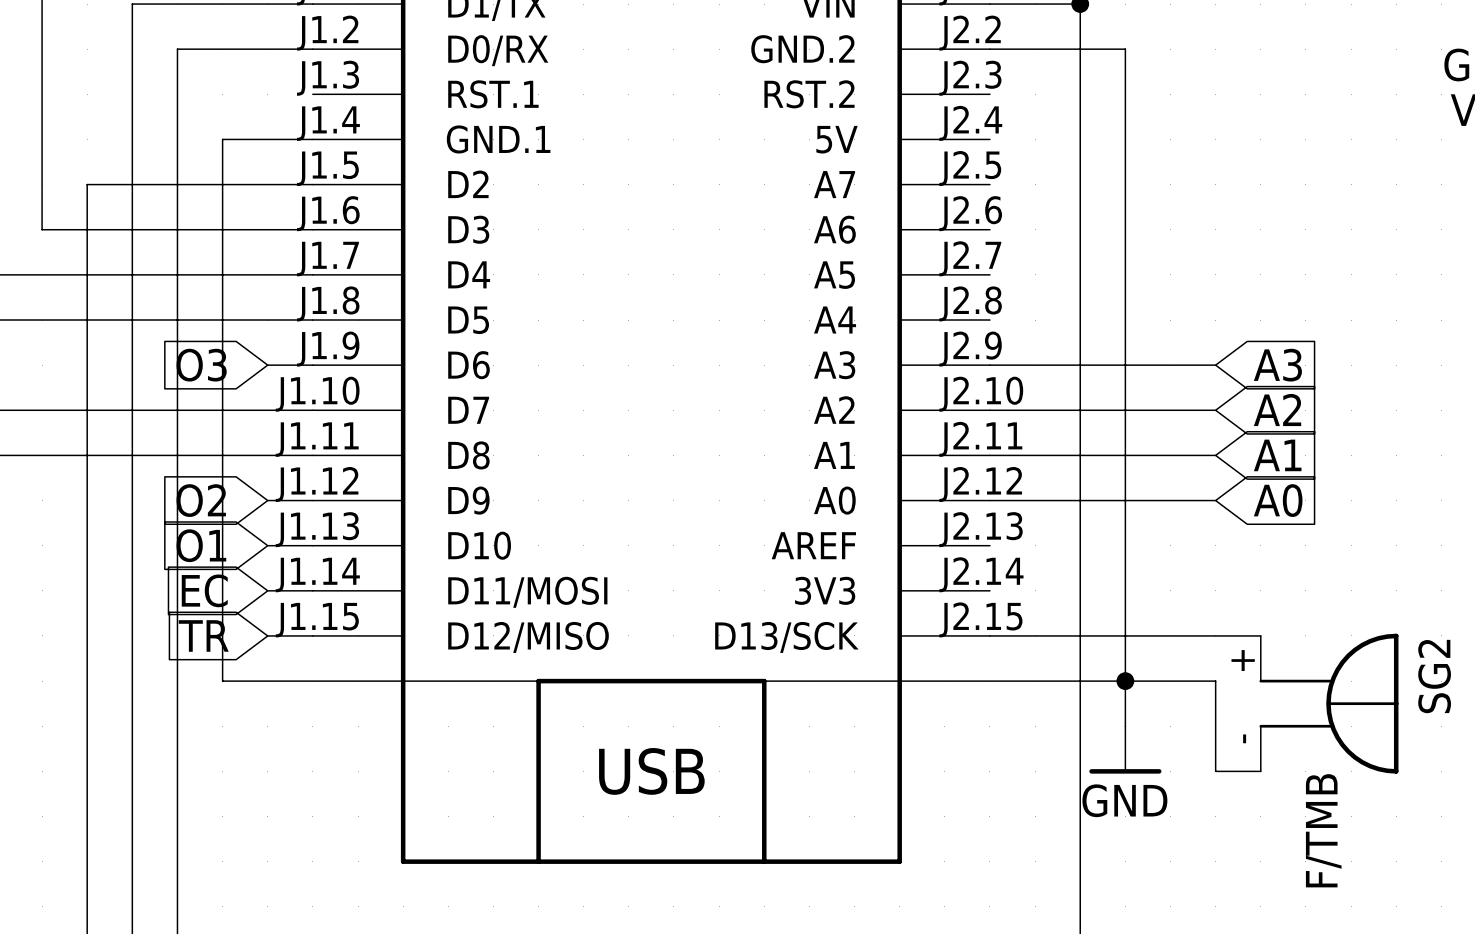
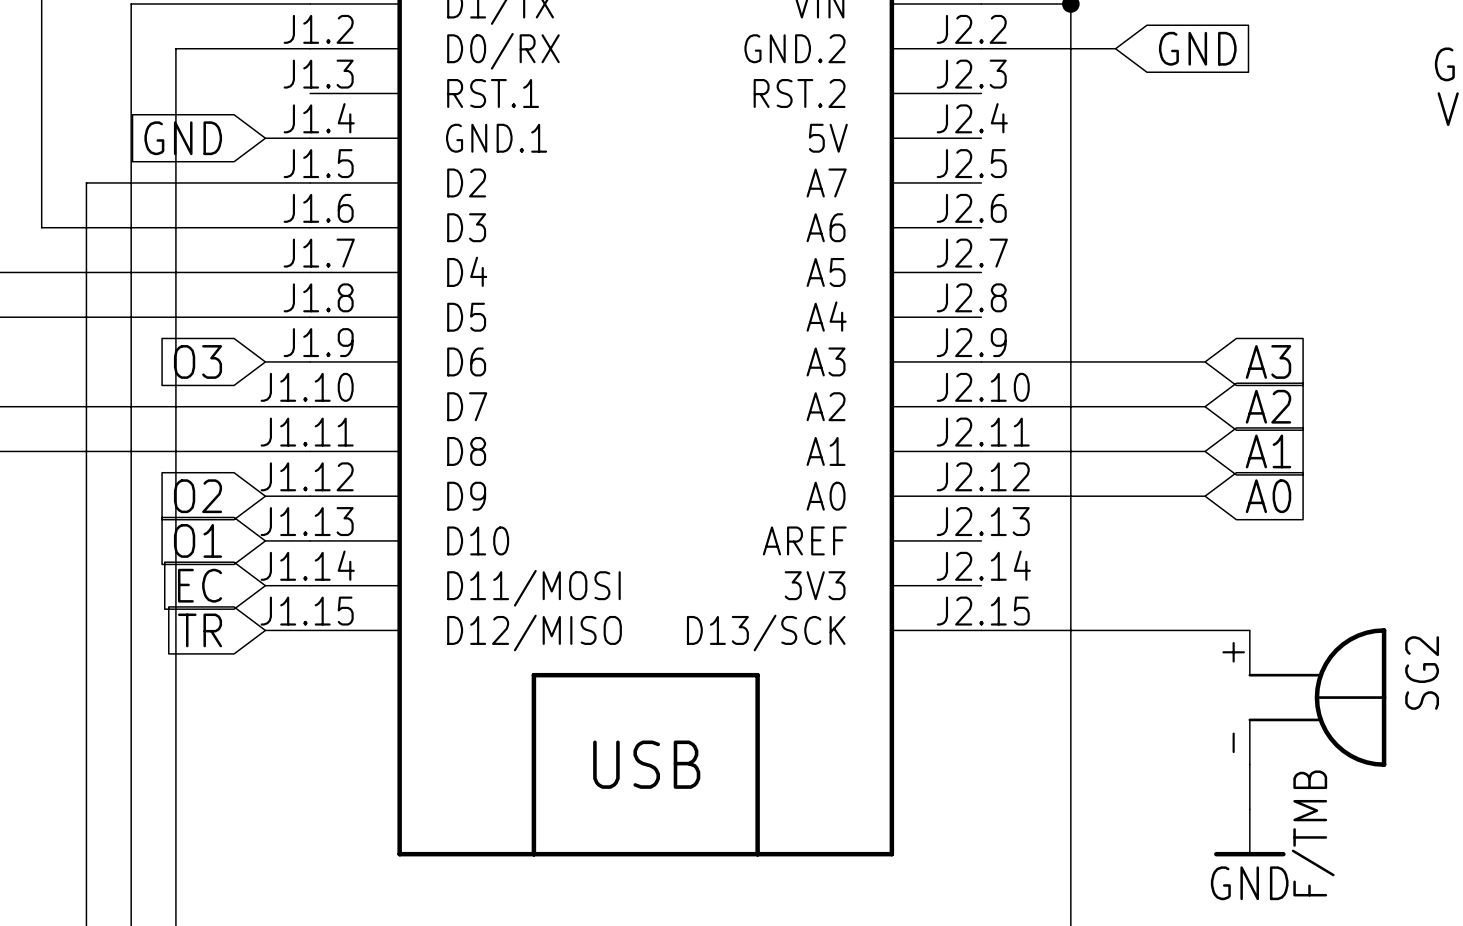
wire: (1125, 49) (1125, 726) -> none
global label: none -> GND (1197, 48)
global label: none -> GND (183, 138)
wire: (267, 139) (222, 139) (222, 681) (1215, 681) (1215, 771) (1260, 771) -> (1249, 809) (1249, 764)
junction: (1125, 681) -> none
power symbol position: GND (1125, 749) -> GND (1249, 832)

